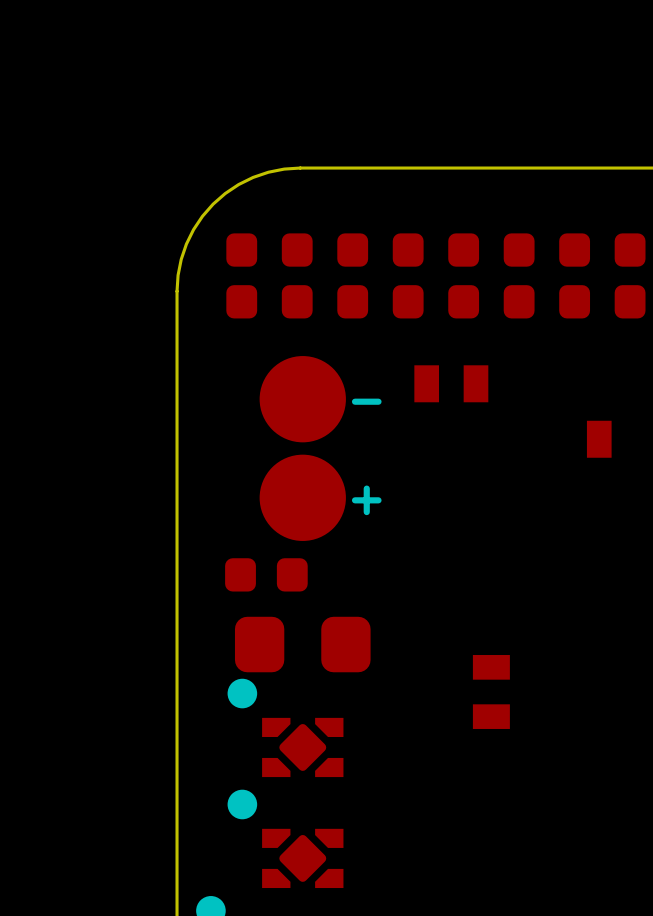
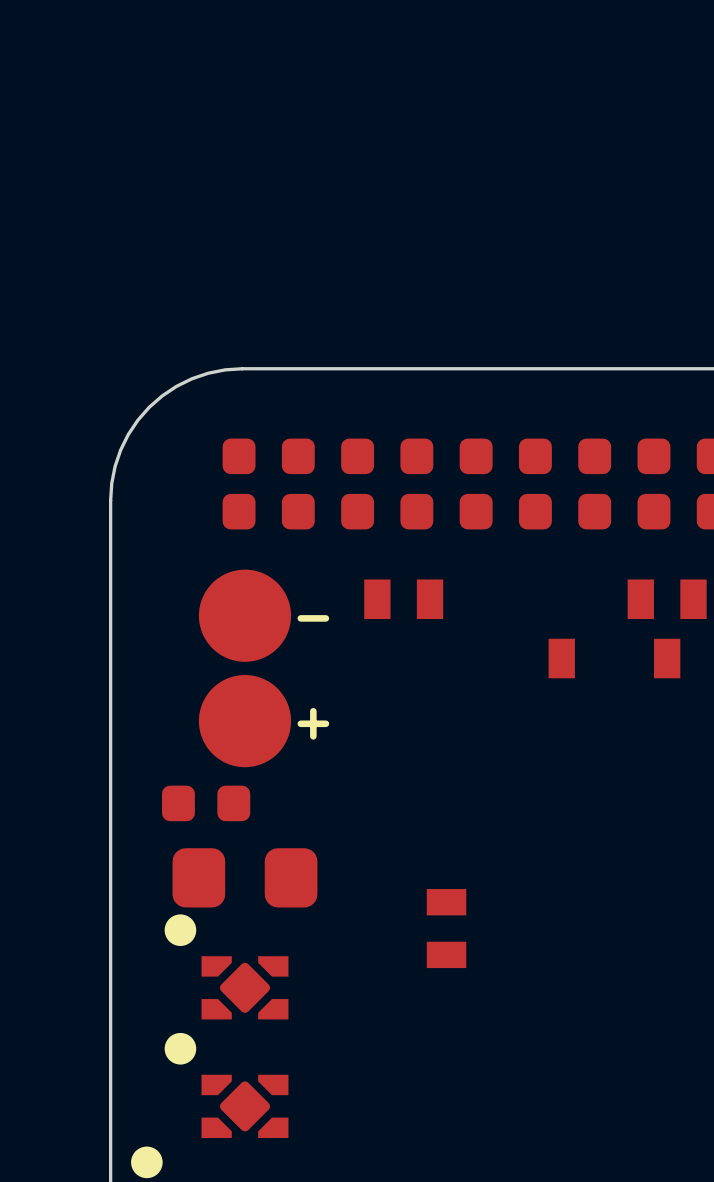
part: (241, 275) -> none

